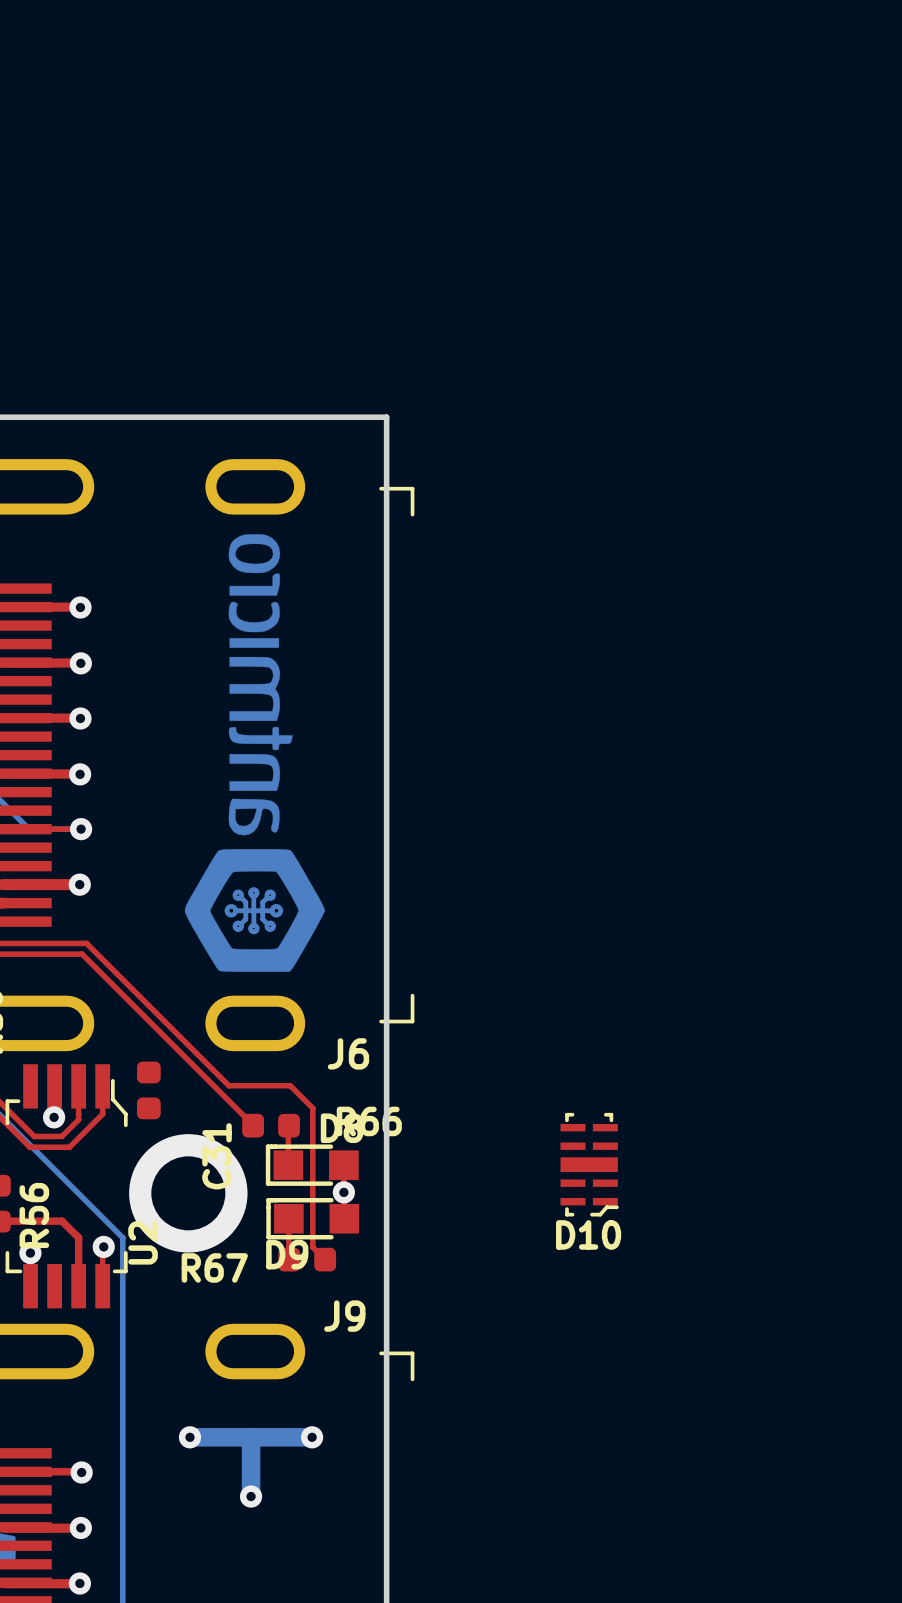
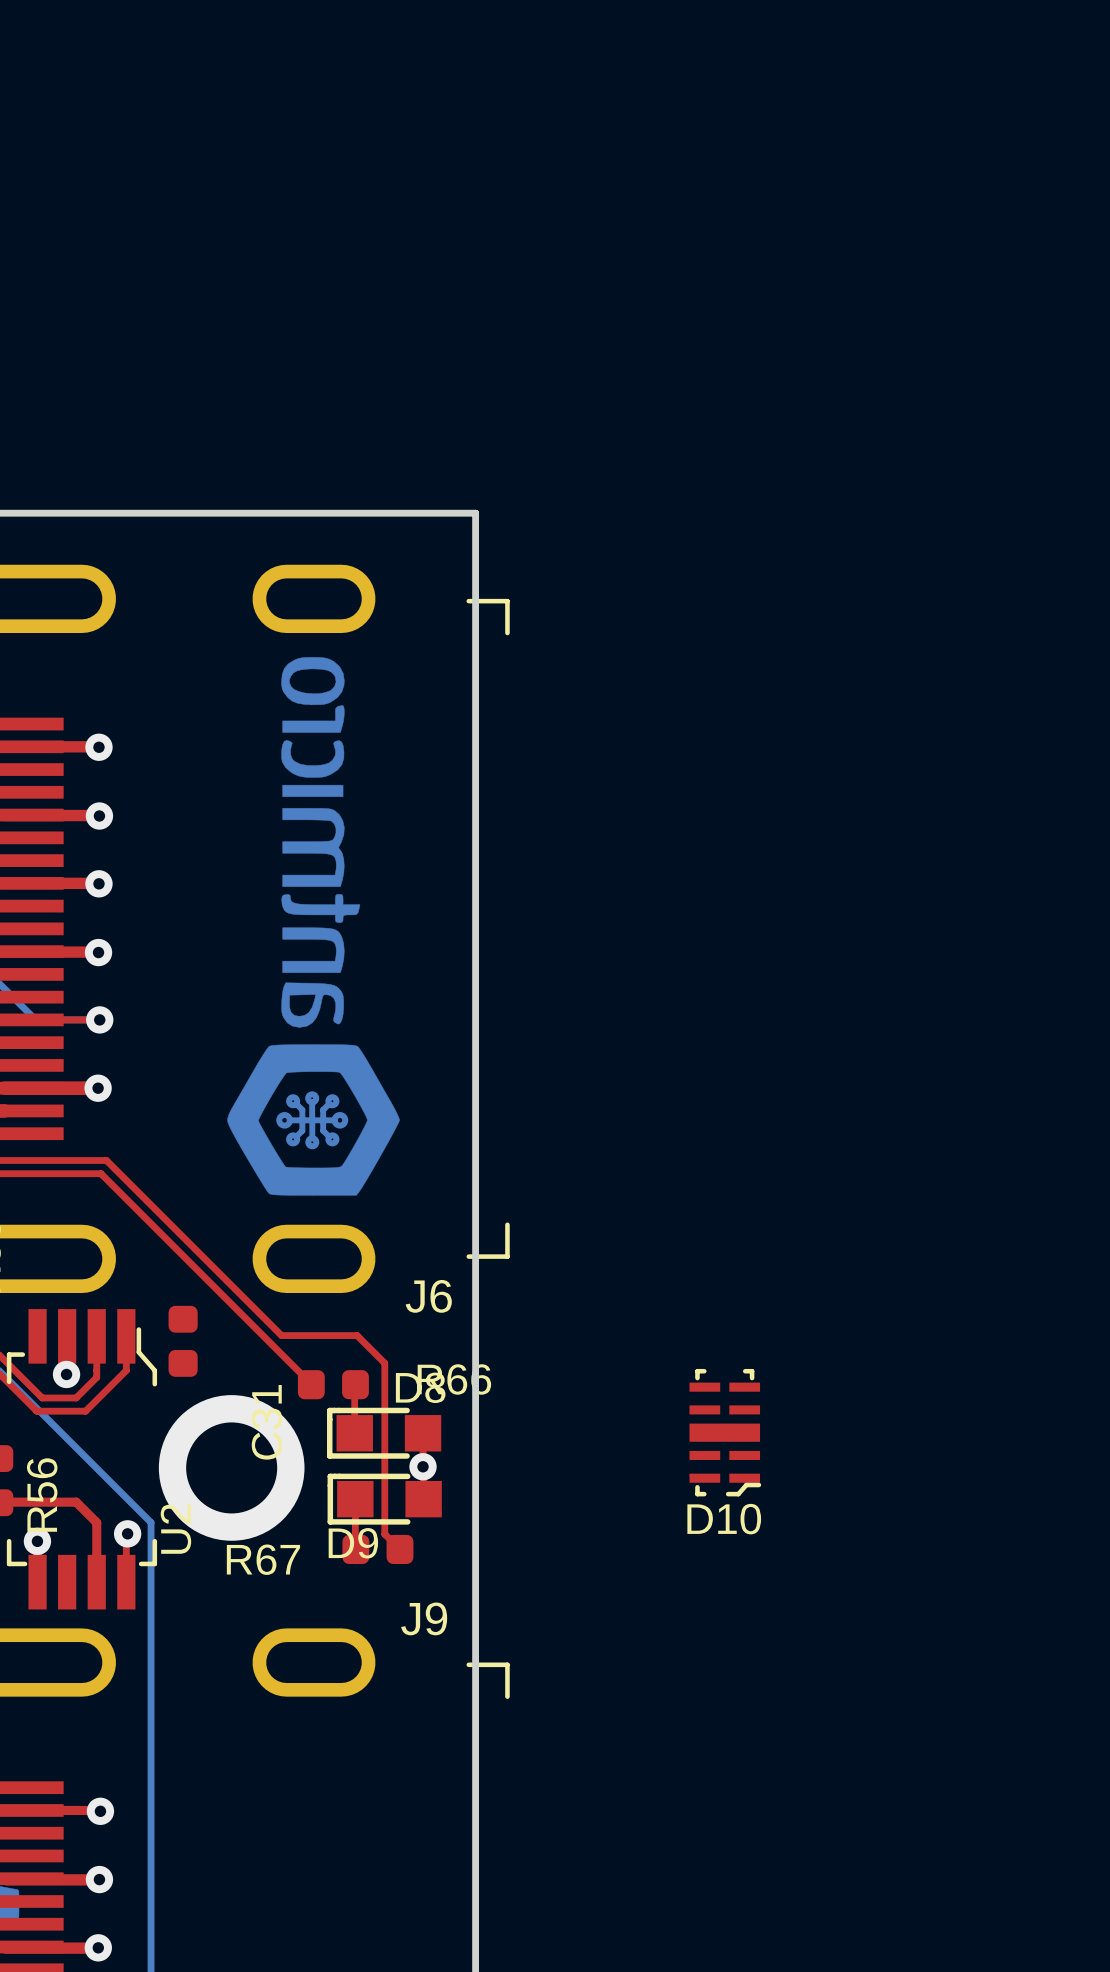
bottom track: (189, 1437) (312, 1437) -> none
via: (189, 1437) -> none
bottom track: (251, 1437) (251, 1496) -> none
via: (312, 1437) -> none
via: (251, 1496) -> none

